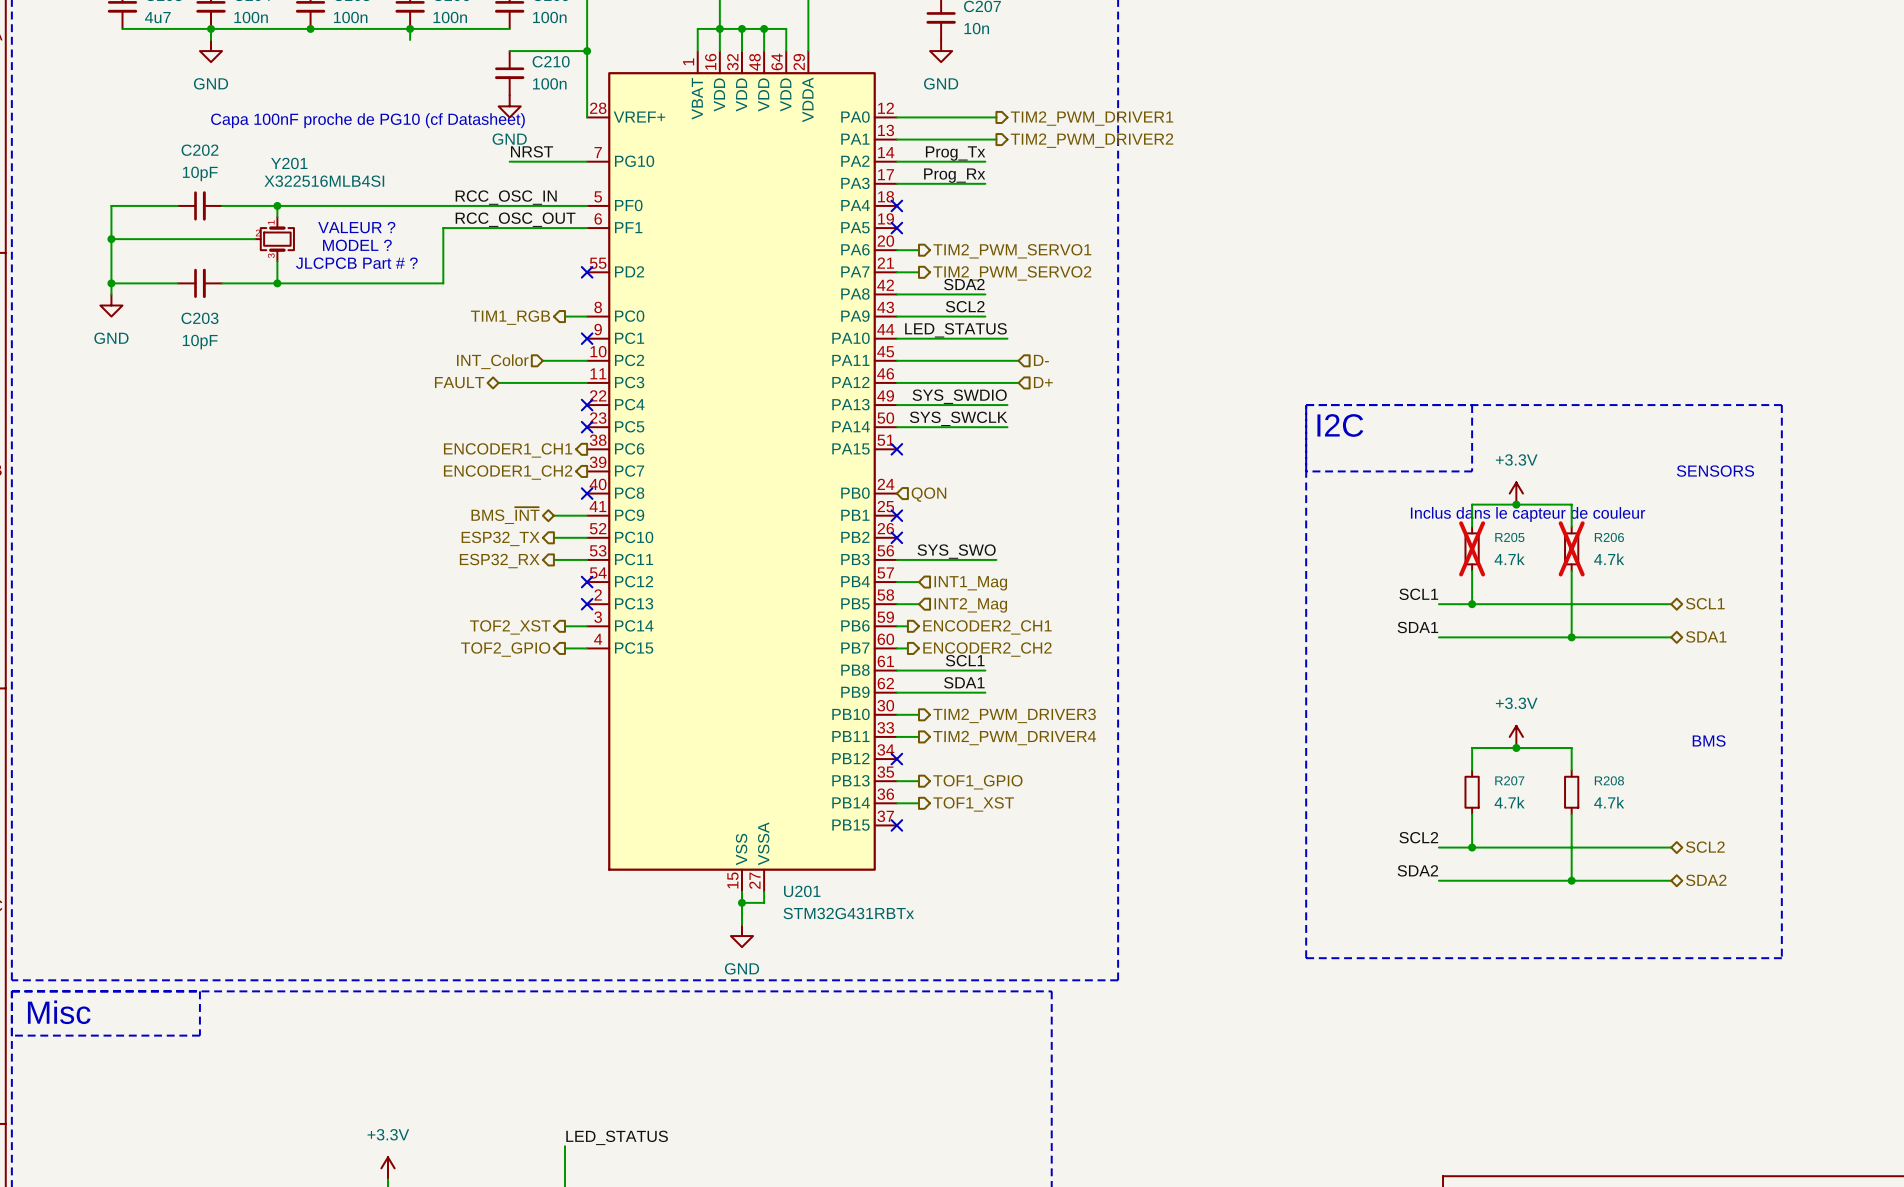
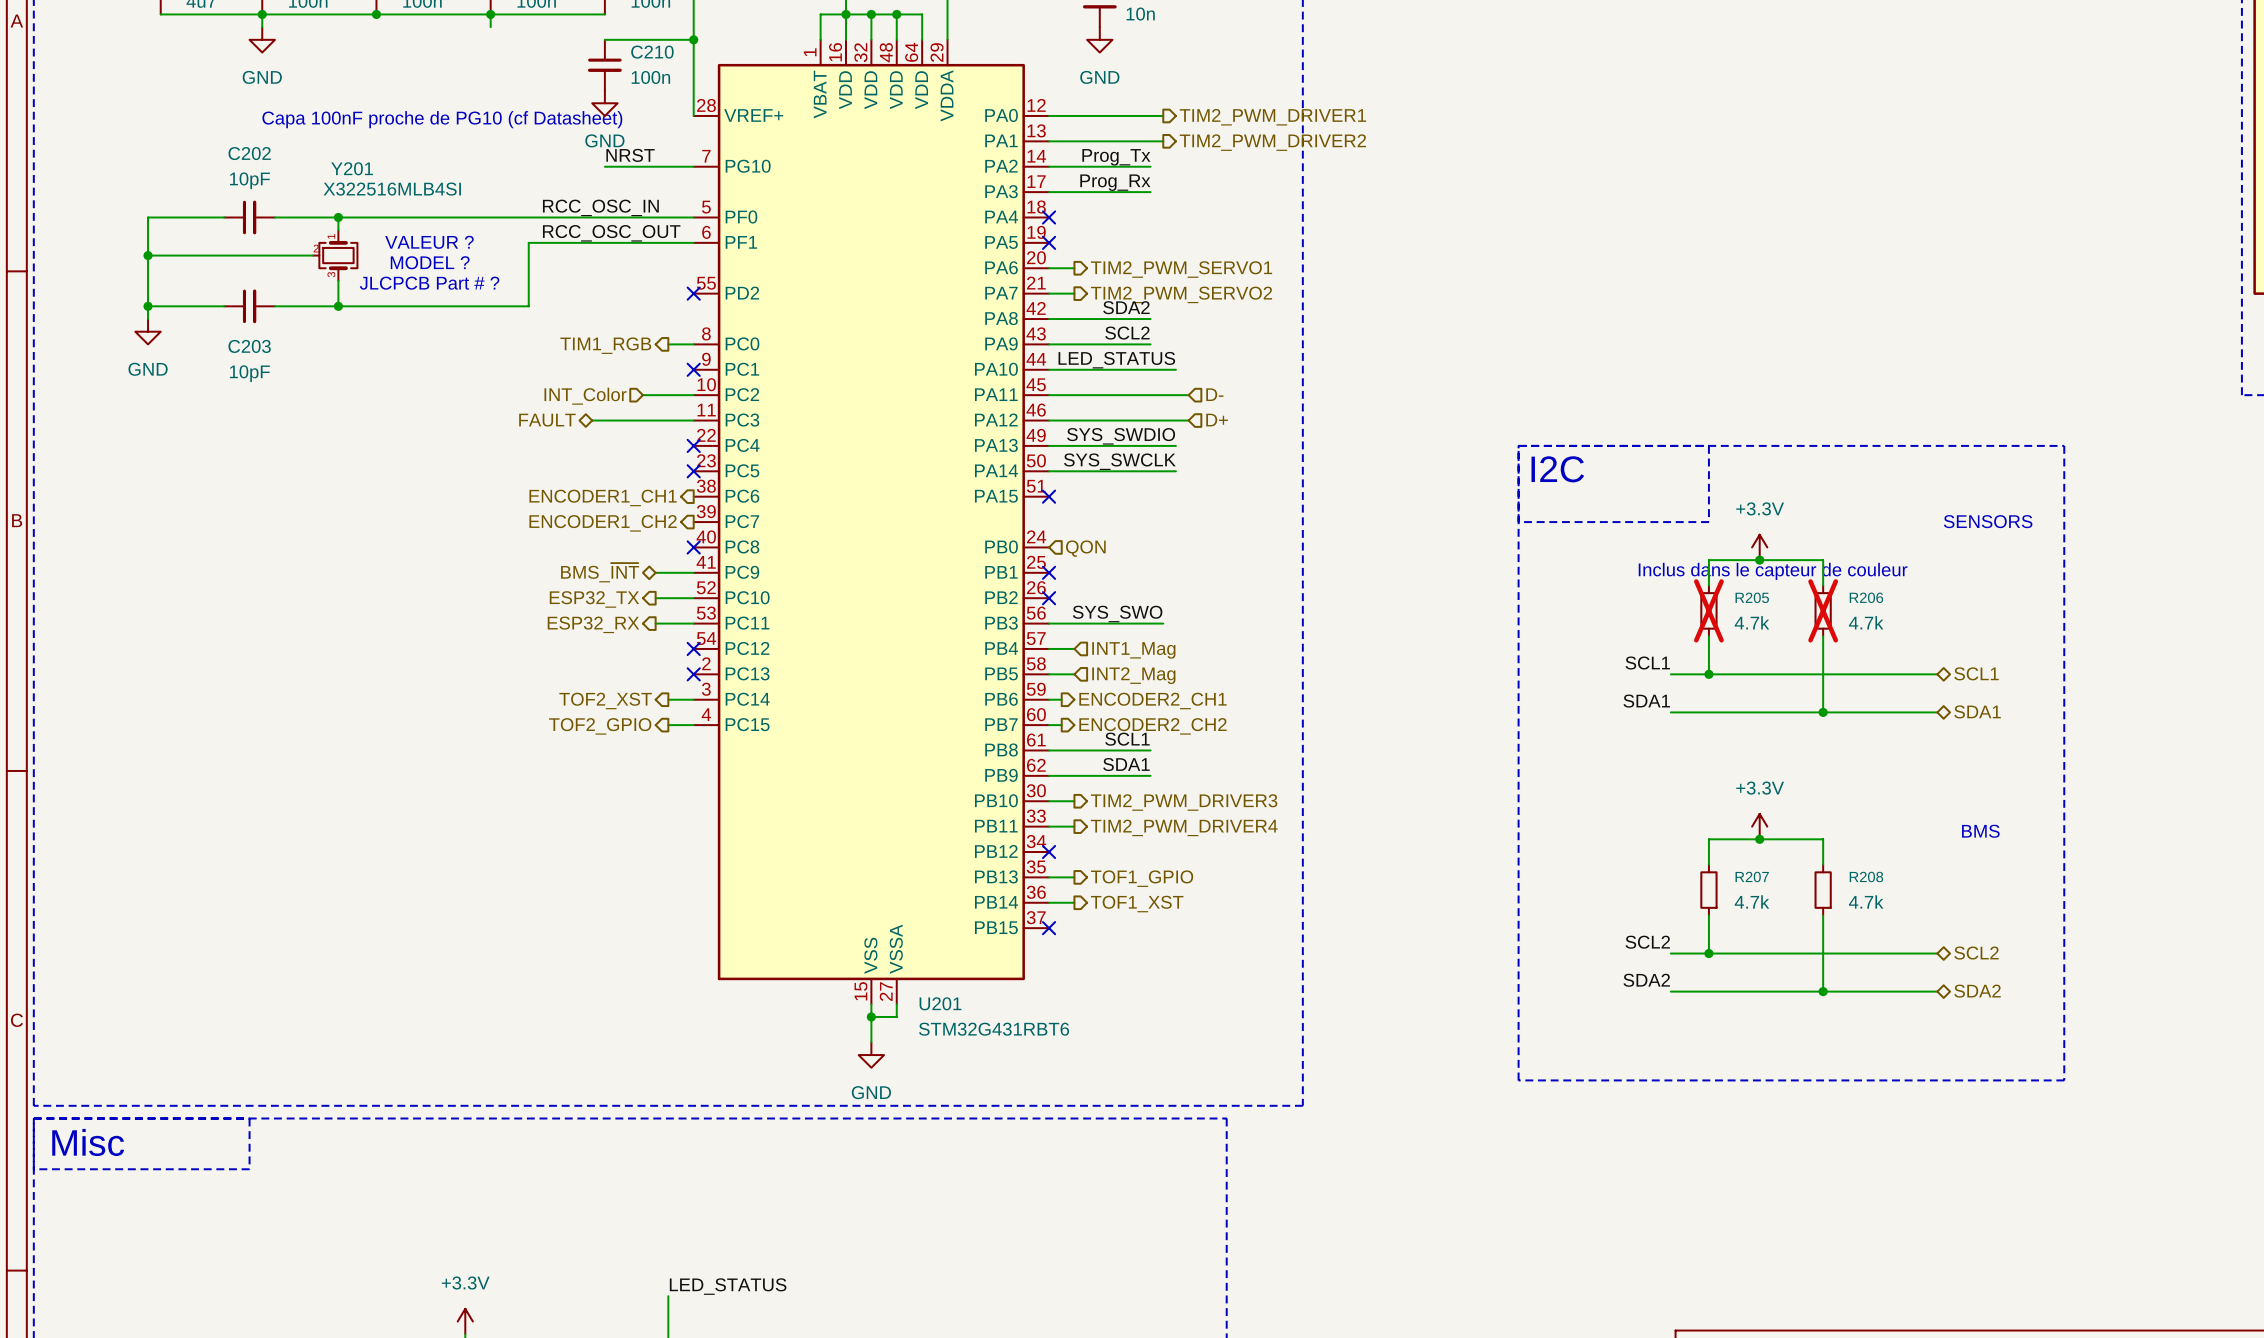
U201 value: STM32G431RBTx (848, 913) -> STM32G431RBT6 (994, 1029)

